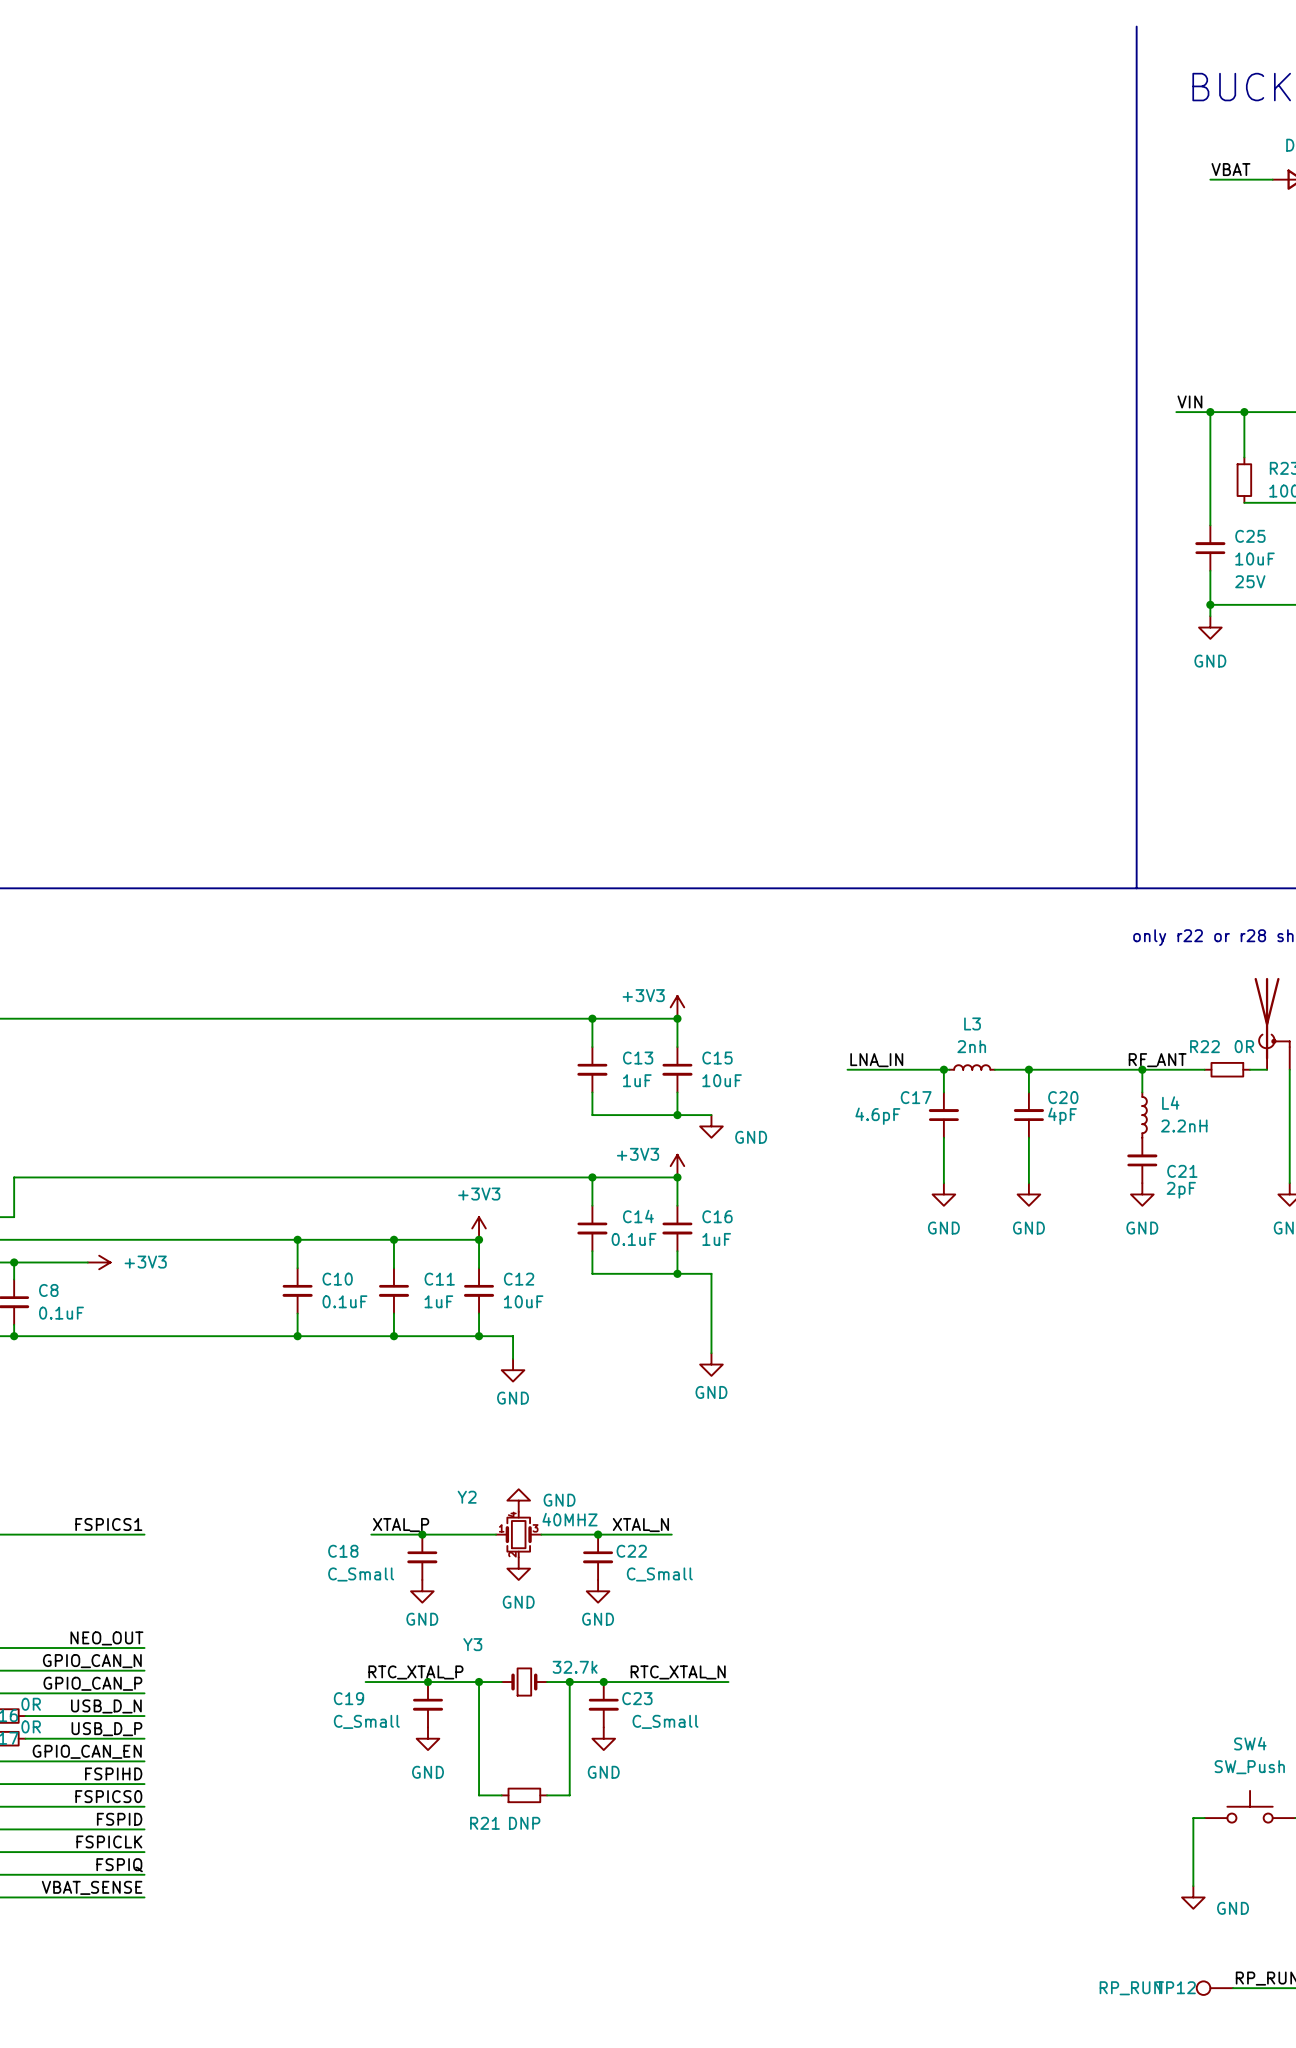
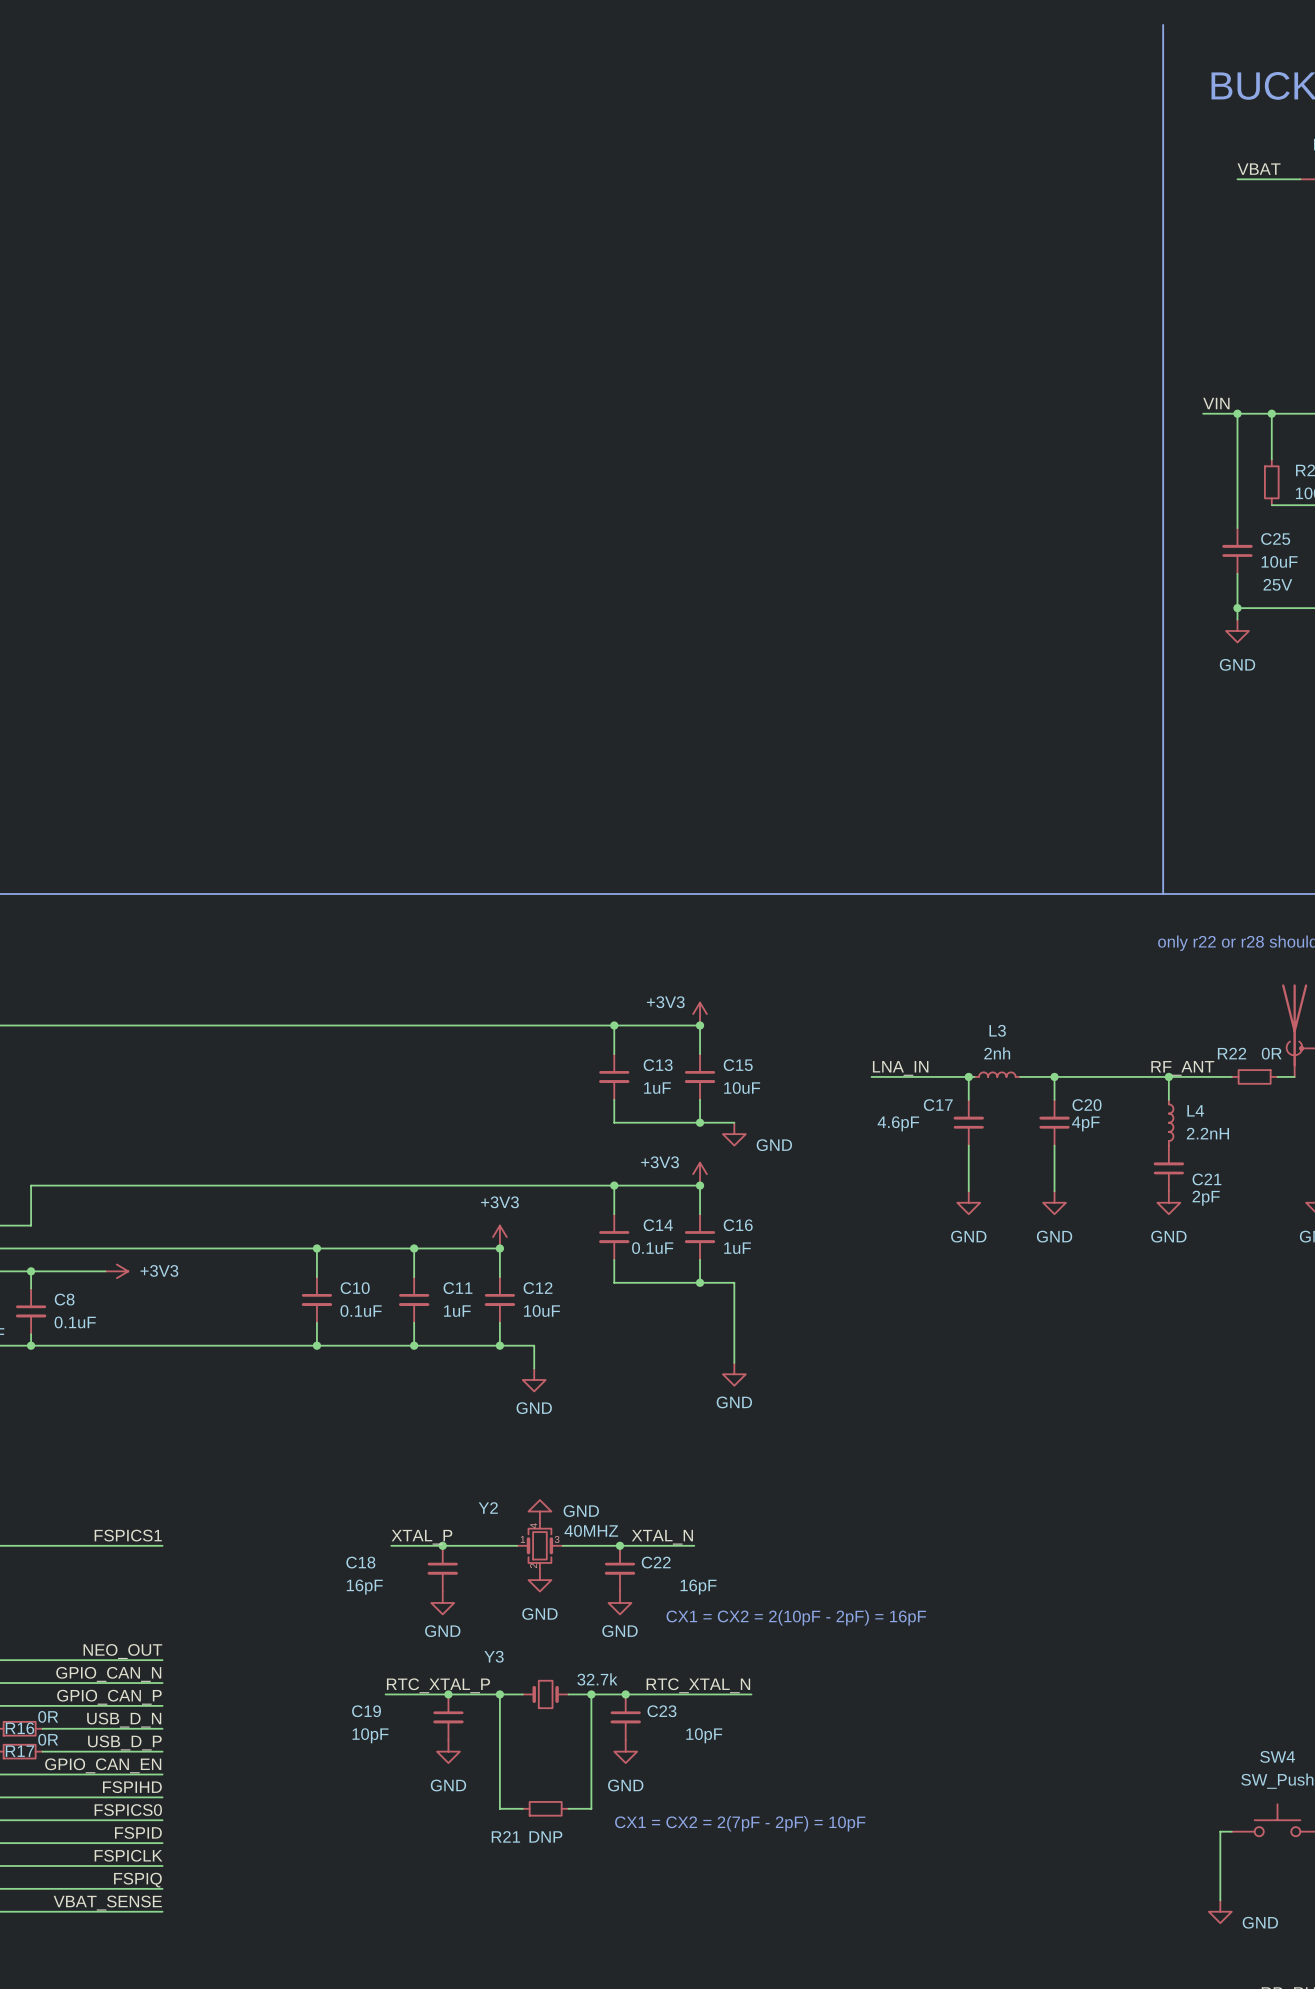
C18 value: C_Small (361, 1574) -> 16pF (364, 1587)
C22 value: C_Small (659, 1574) -> 16pF (698, 1587)
text: none -> CX1 = CX2 = 2(10pF - 2pF) = 16pF (796, 1617)
C19 value: C_Small (366, 1721) -> 10pF (370, 1735)
C23 value: C_Small (665, 1721) -> 10pF (704, 1735)
text: none -> CX1 = CX2 = 2(7pF - 2pF) = 10pF (740, 1823)

